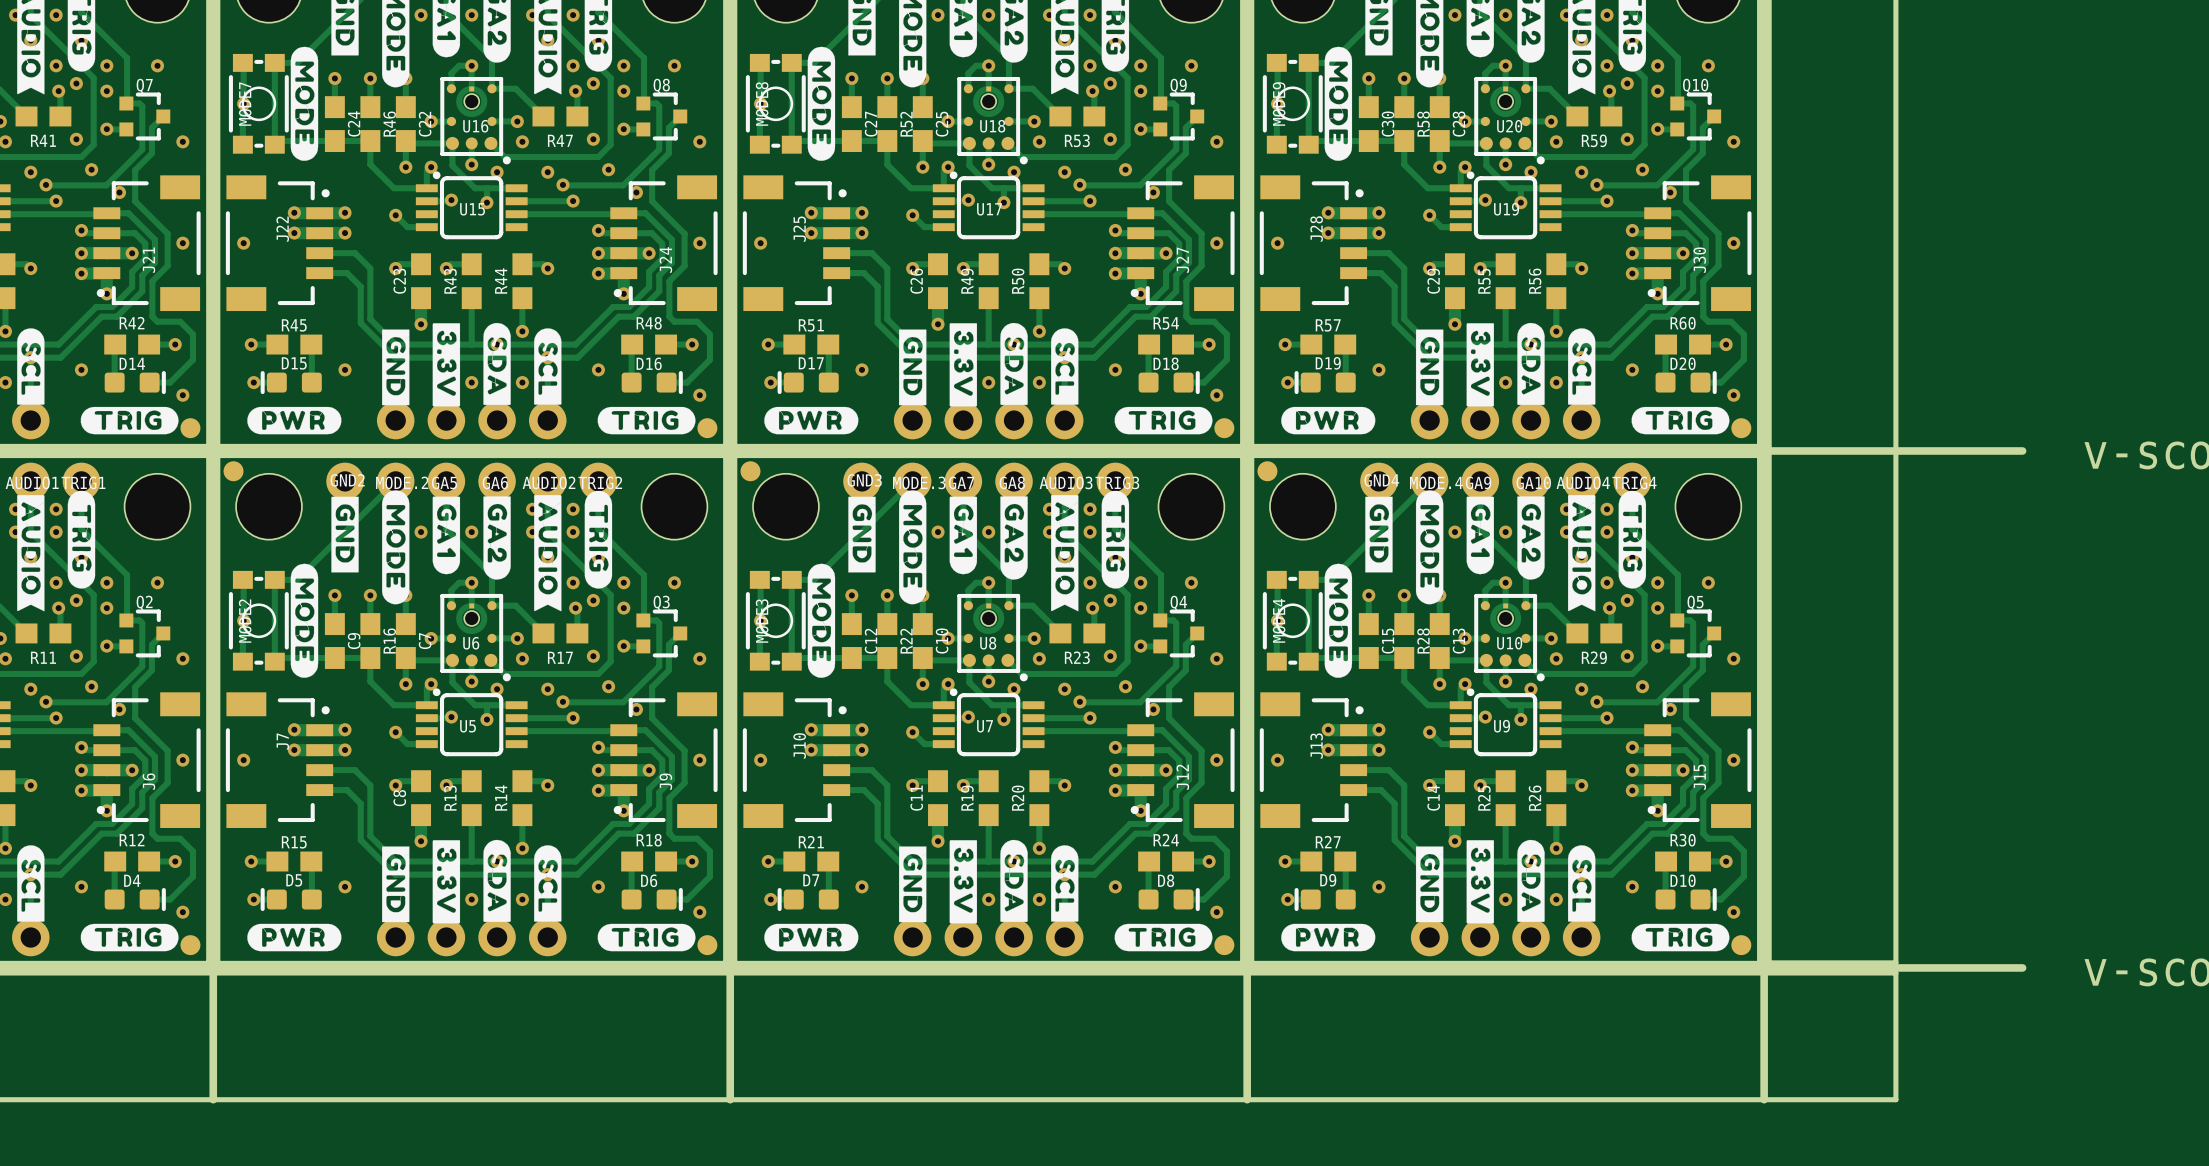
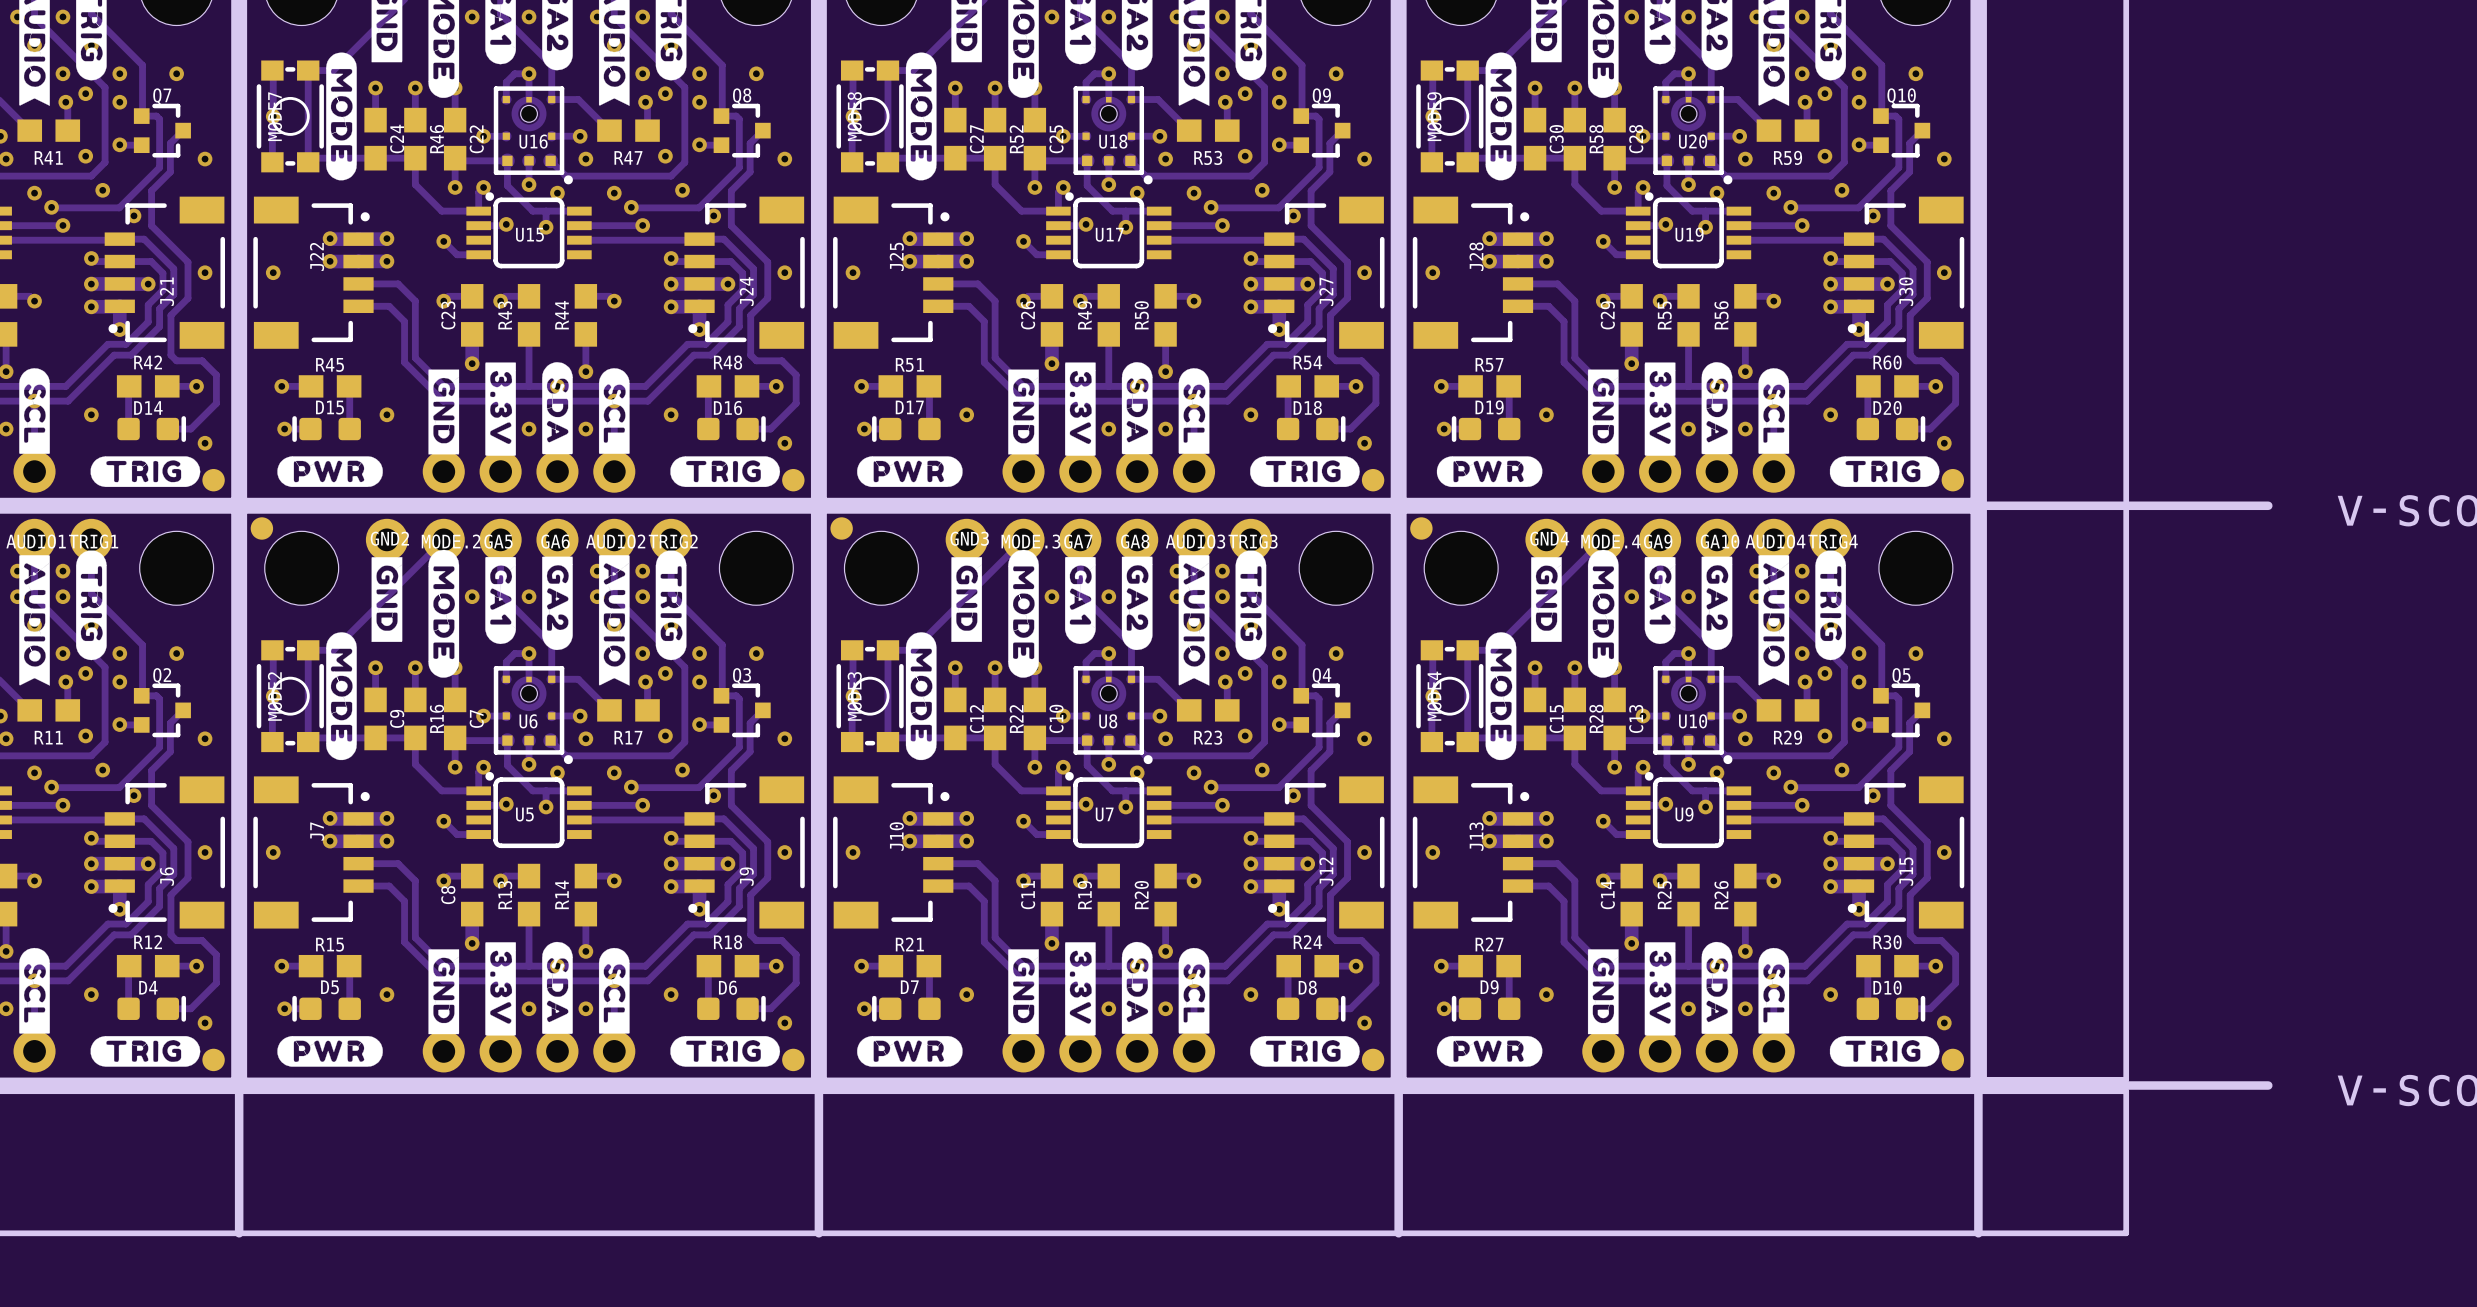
U16 footprint: [440, 76, 511, 165] -> [493, 86, 573, 185]
U18 footprint: [957, 76, 1028, 165] -> [1073, 86, 1153, 185]
U20 footprint: [1474, 76, 1545, 165] -> [1653, 86, 1733, 185]
U6 footprint: [440, 593, 511, 682] -> [493, 666, 573, 765]
U8 footprint: [957, 593, 1028, 682] -> [1073, 666, 1153, 765]
U10 footprint: [1474, 593, 1545, 682] -> [1653, 666, 1733, 765]

